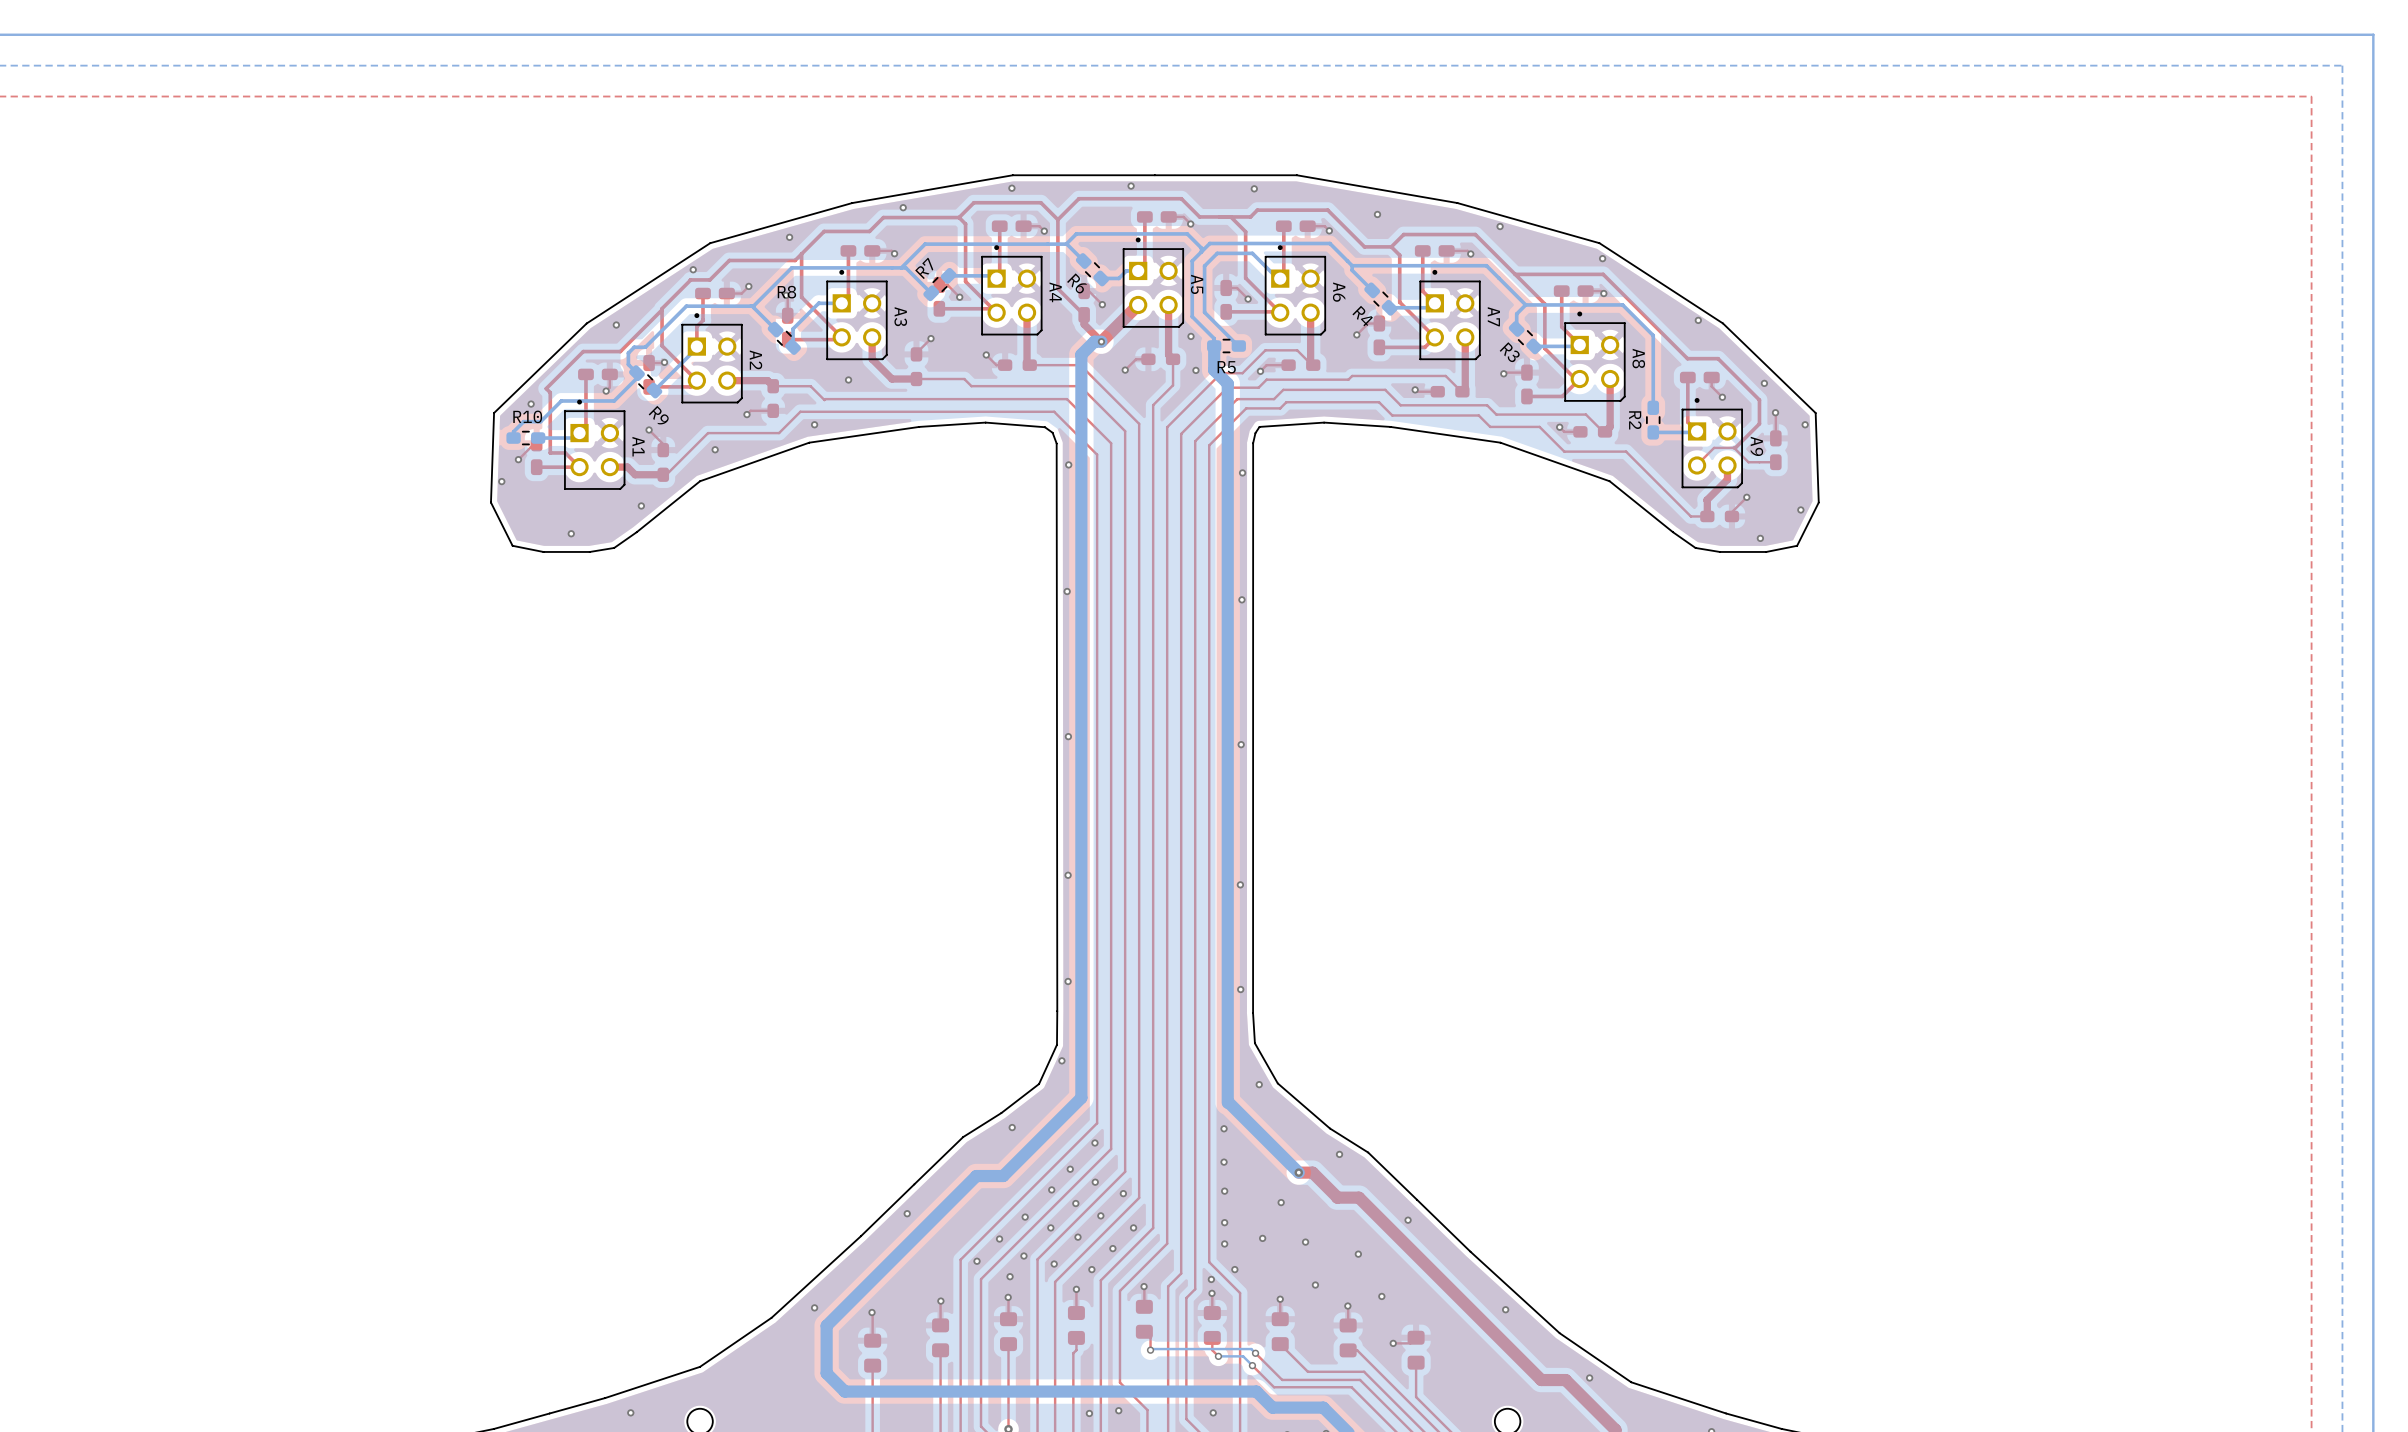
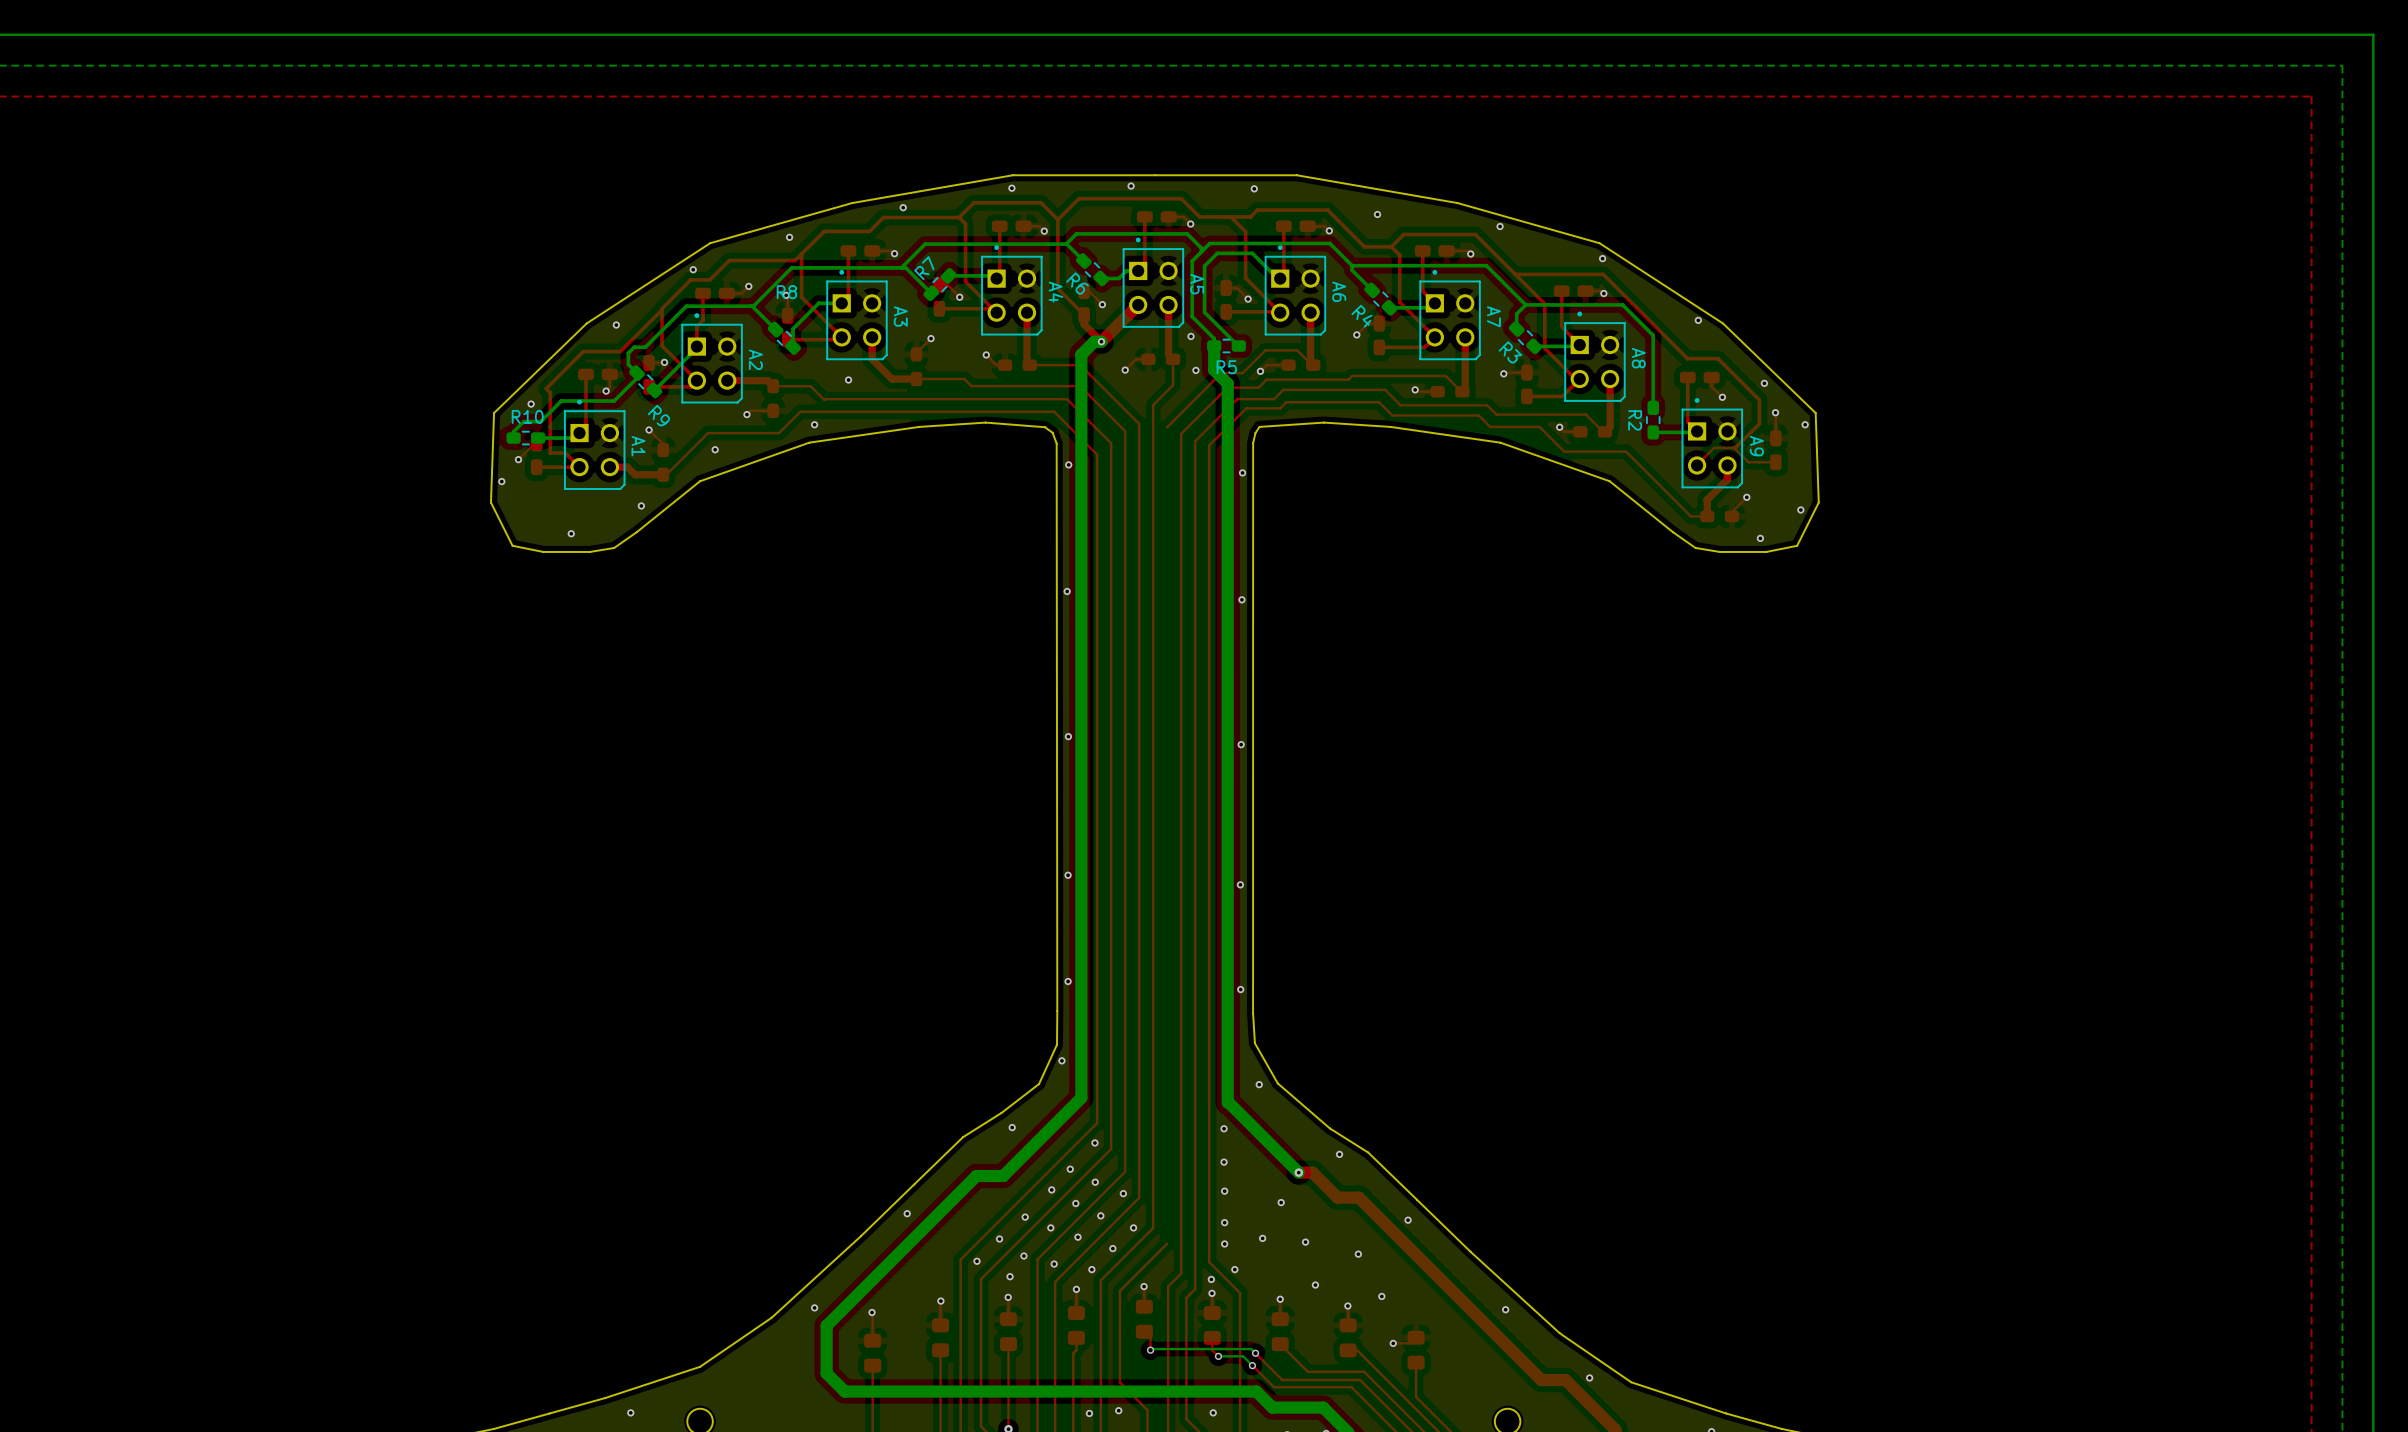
top track: (1167, 427) (1167, 1243) -> none

